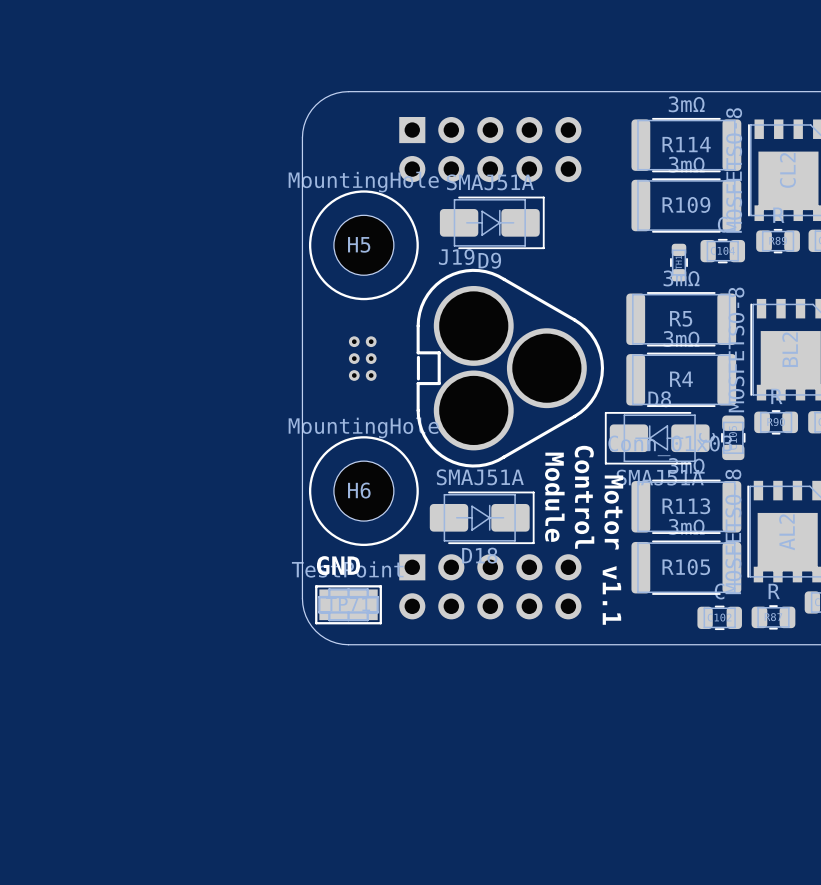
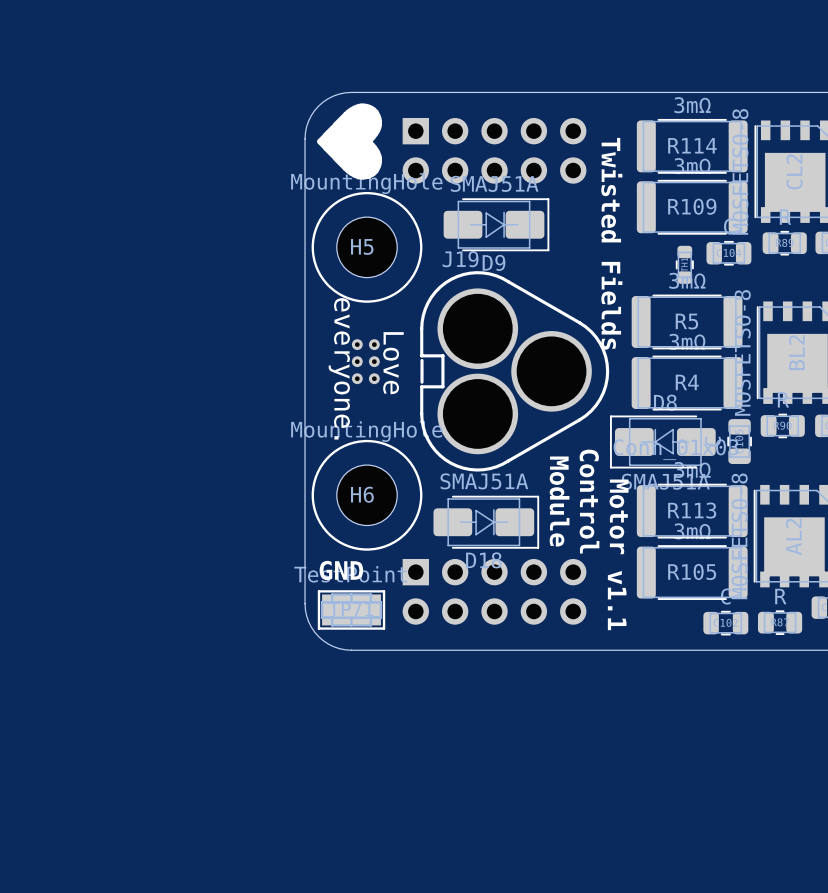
drawing: none -> [317, 103, 382, 180]
text: none -> Twisted Fields (611, 243)
text: none -> Love (393, 363)
text: none -> everyone. (339, 368)

